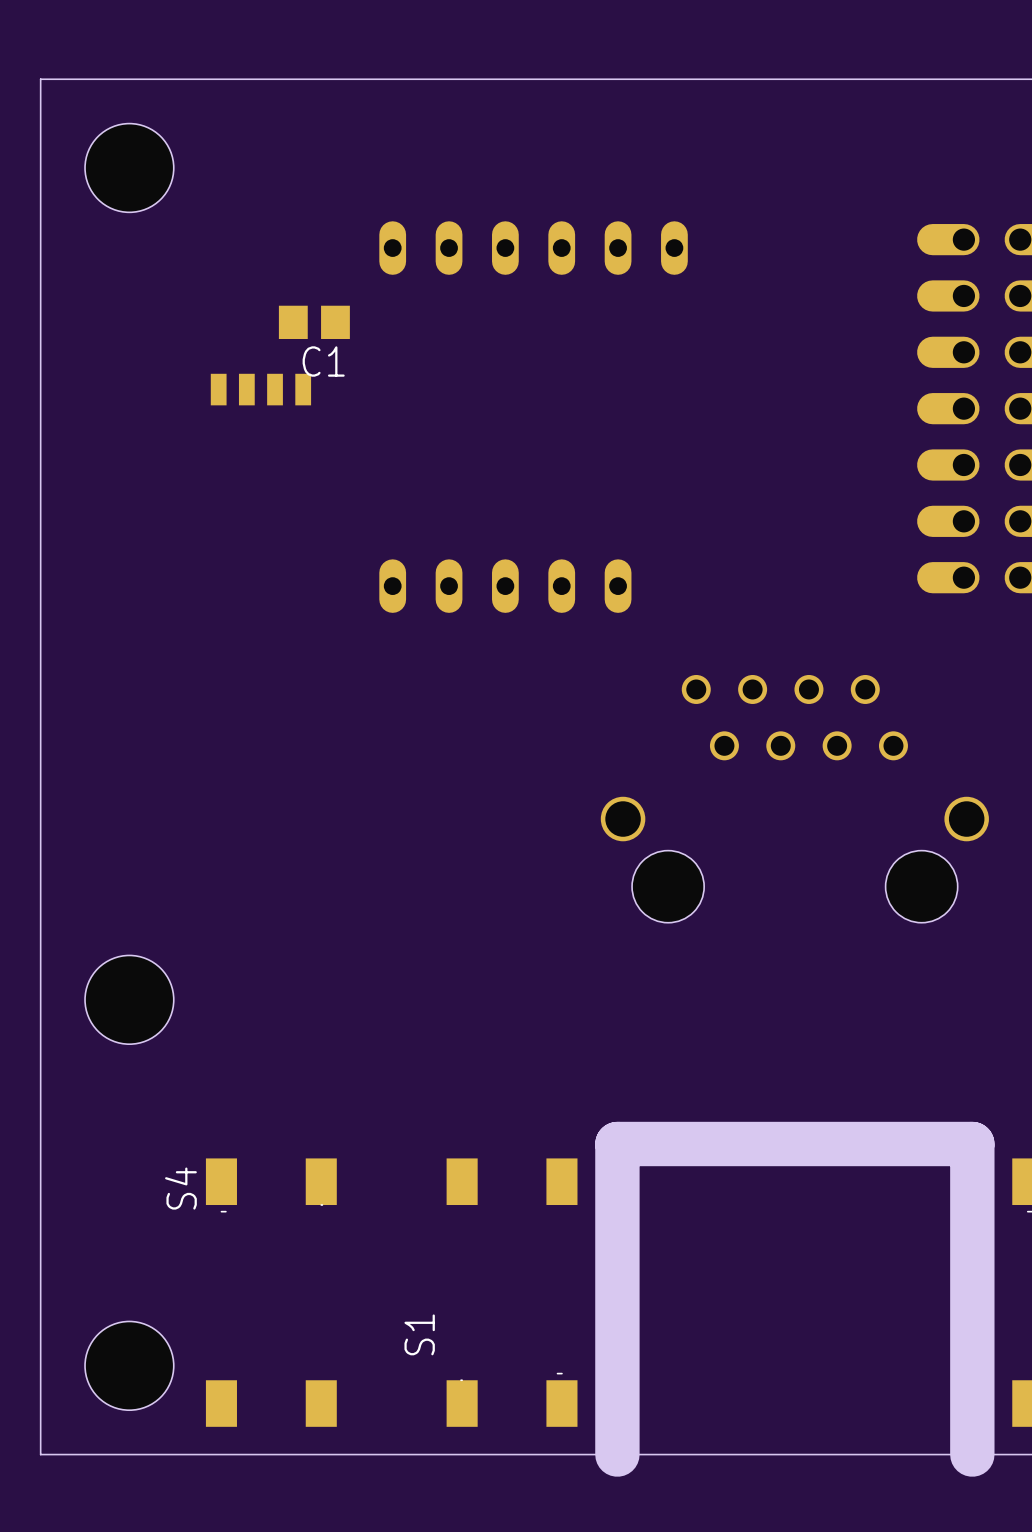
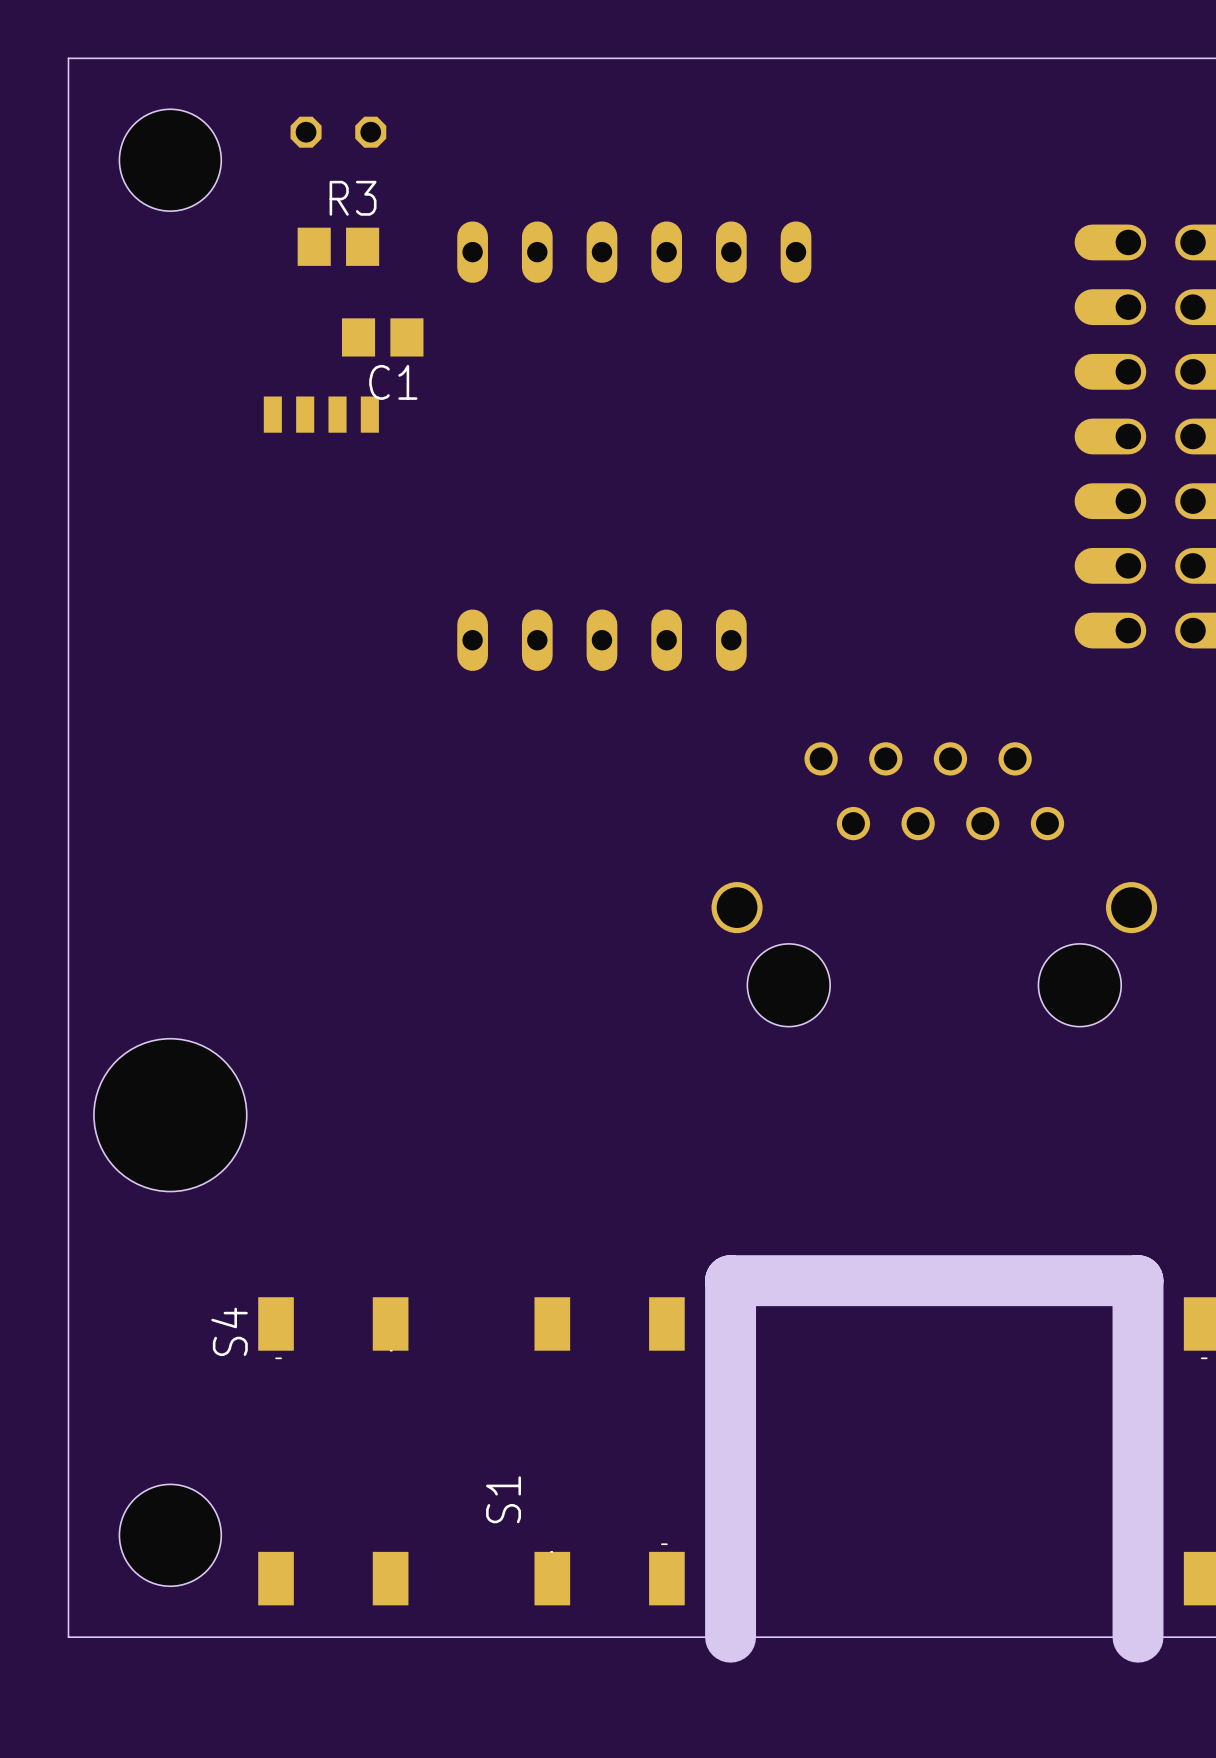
part: none -> (338, 132)
R3: none -> (338, 246)
hole size: [85, 955, 174, 1045] -> [93, 1038, 247, 1192]

